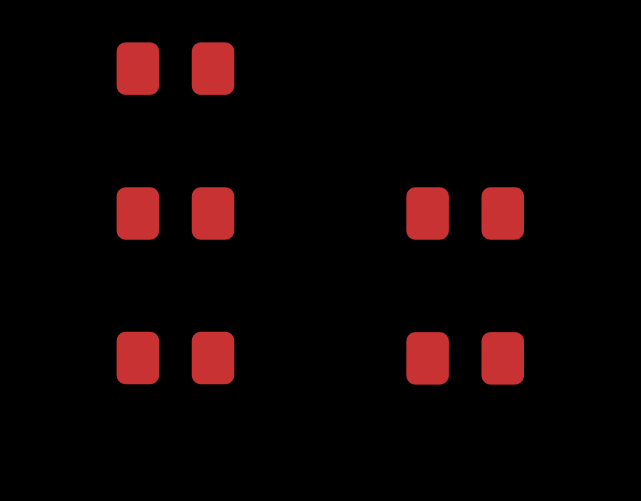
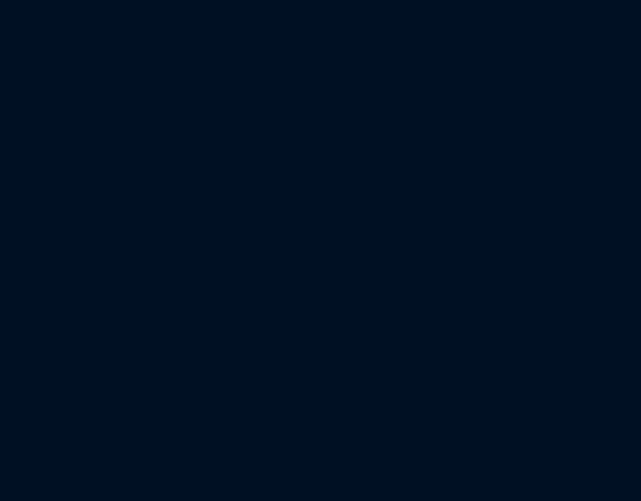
part: (175, 68) -> none
part: (175, 213) -> none
part: (465, 213) -> none
part: (175, 358) -> none
part: (465, 358) -> none

